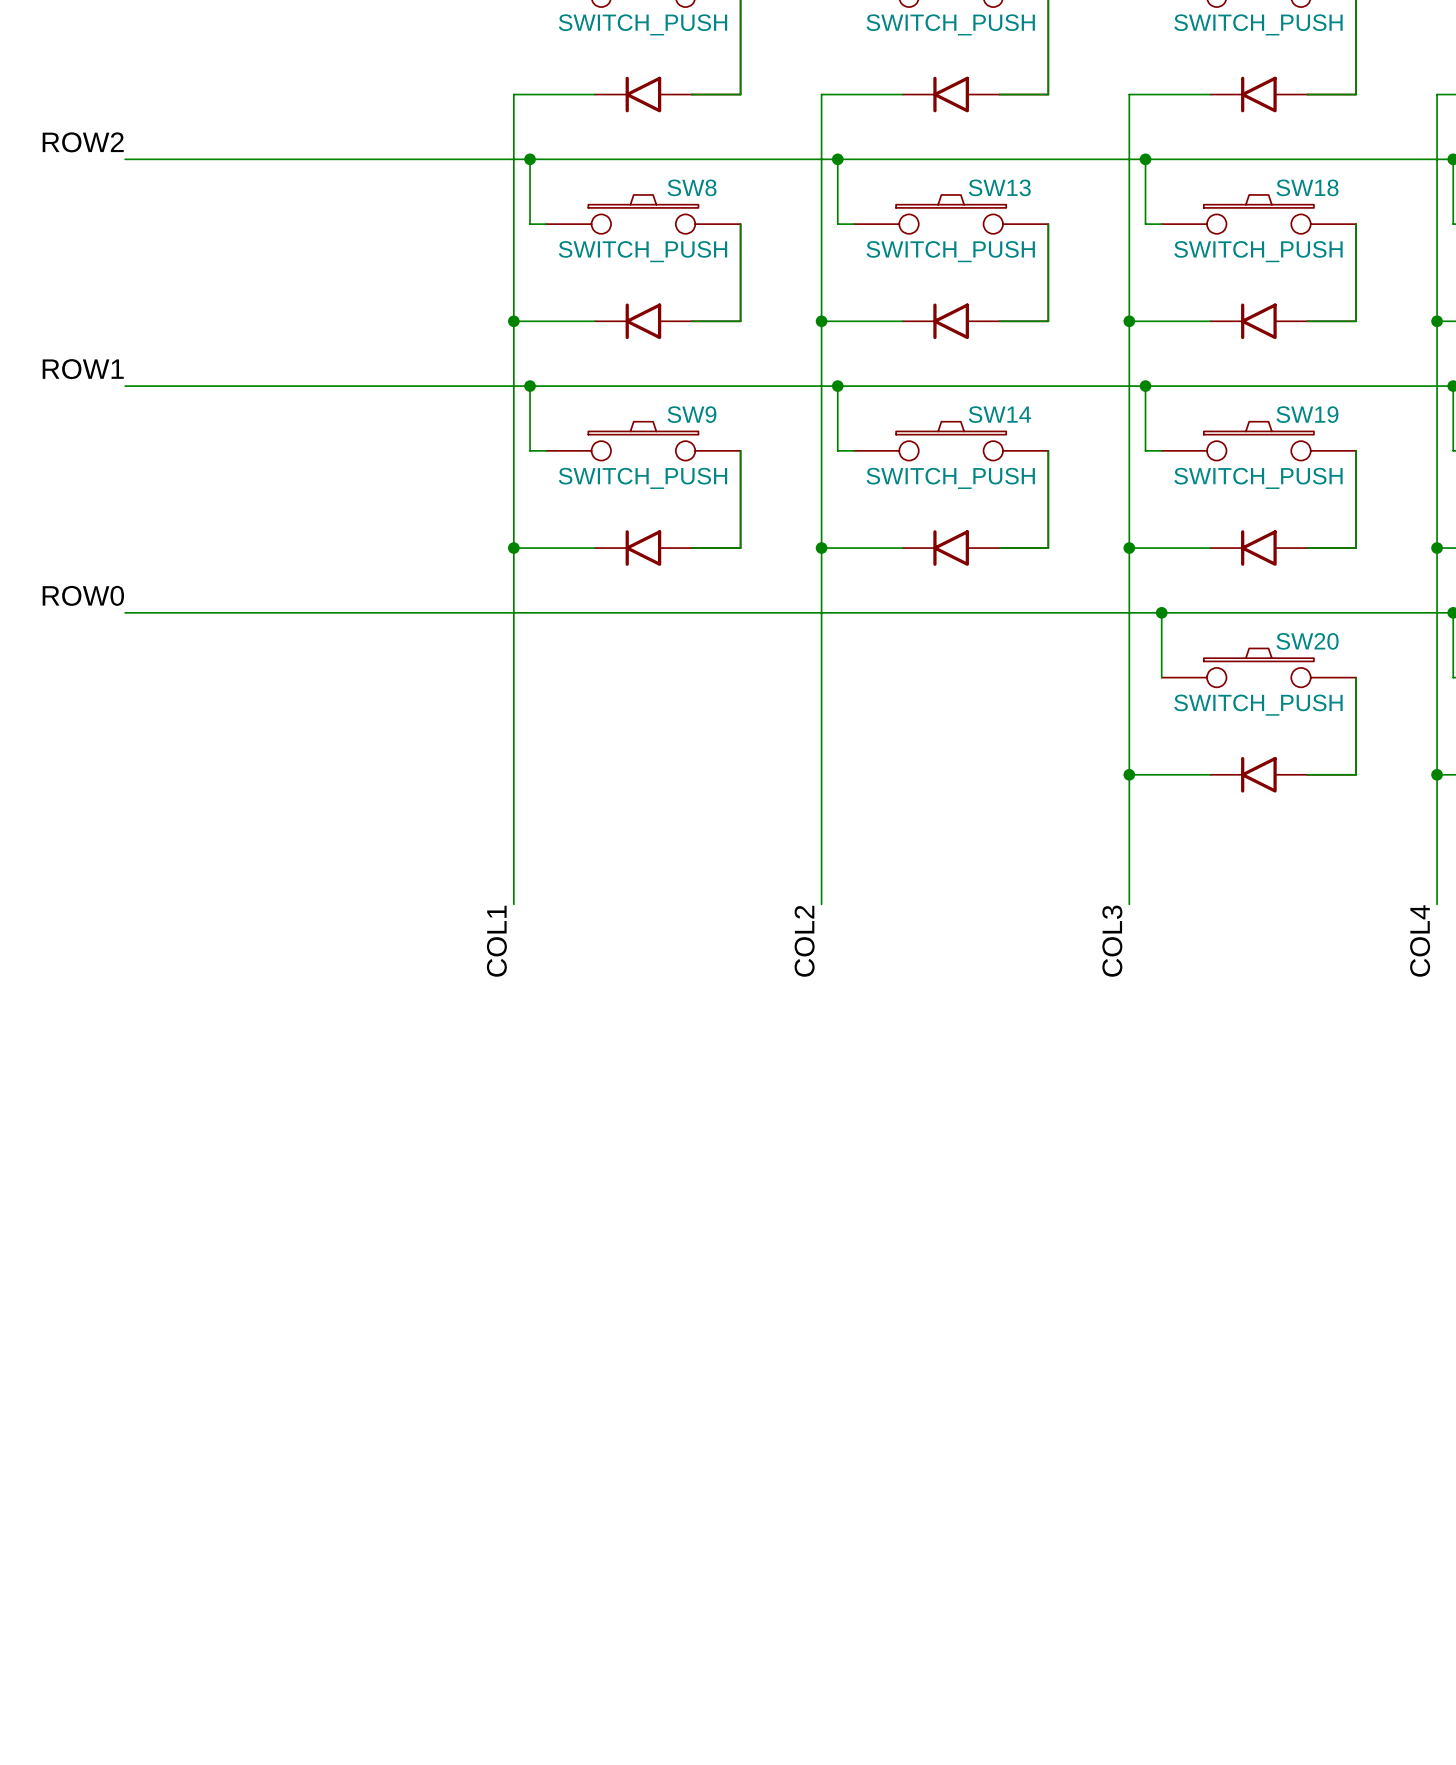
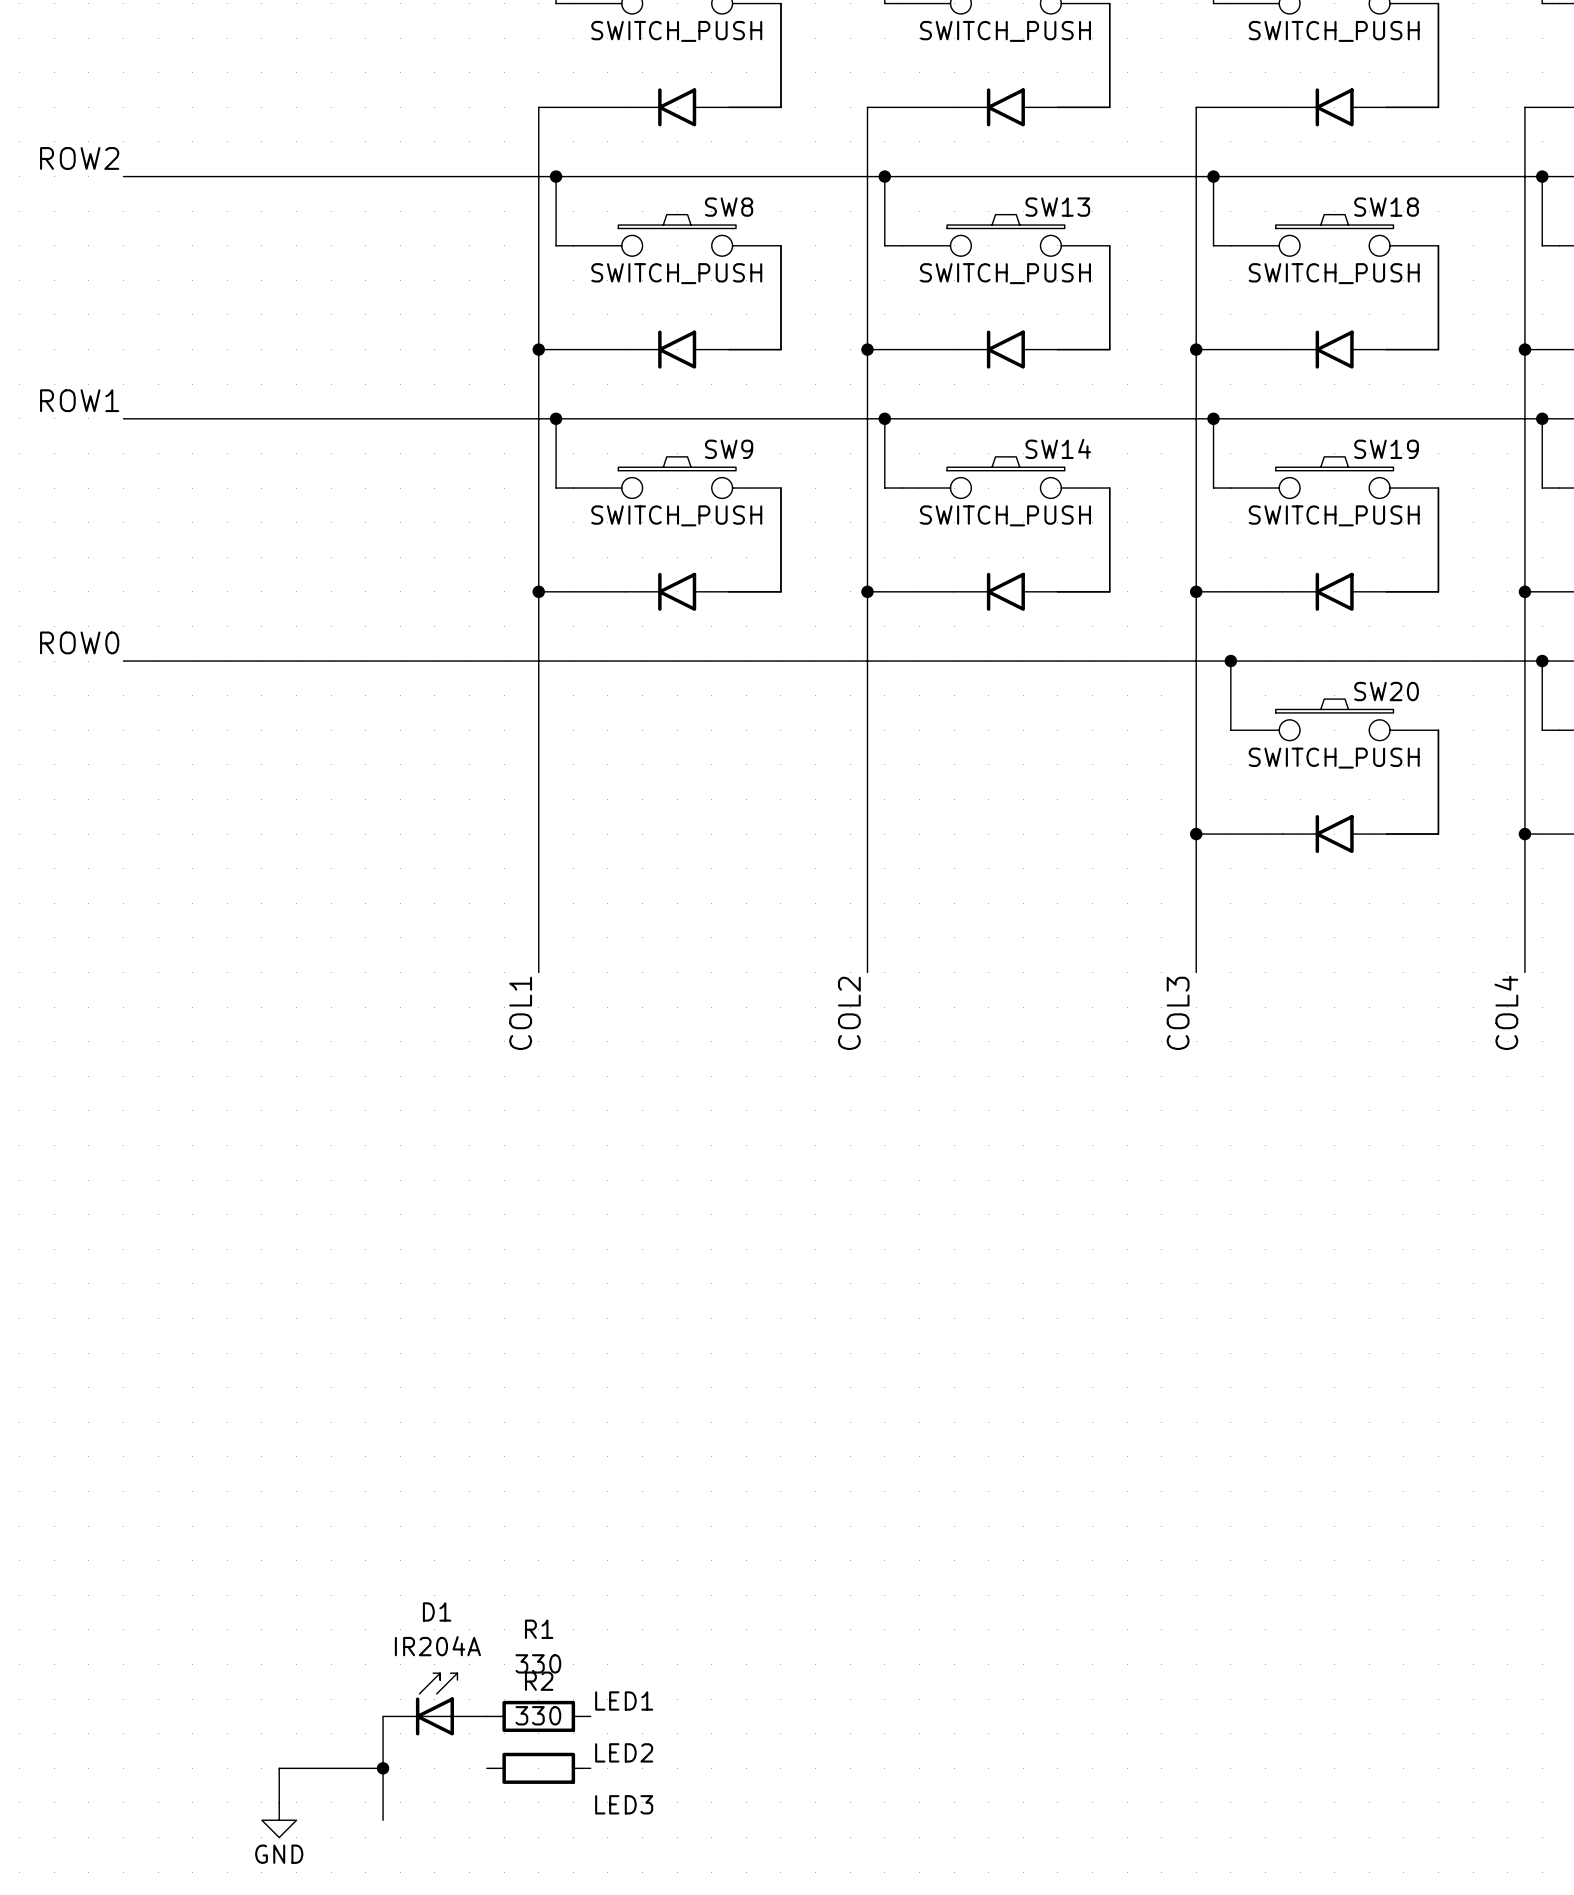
label: none -> LED1 (624, 1700)
D1: none -> IR204A (434, 1704)
wire: none -> (383, 1716) (383, 1820)
R1: none -> 330 (538, 1716)
label: none -> LED2 (624, 1752)
wire: none -> (383, 1768) (279, 1768) (279, 1802)
junction: none -> (383, 1768)
R2: none -> 330 (538, 1768)
label: none -> LED3 (624, 1804)
power symbol: none -> GND (279, 1820)

